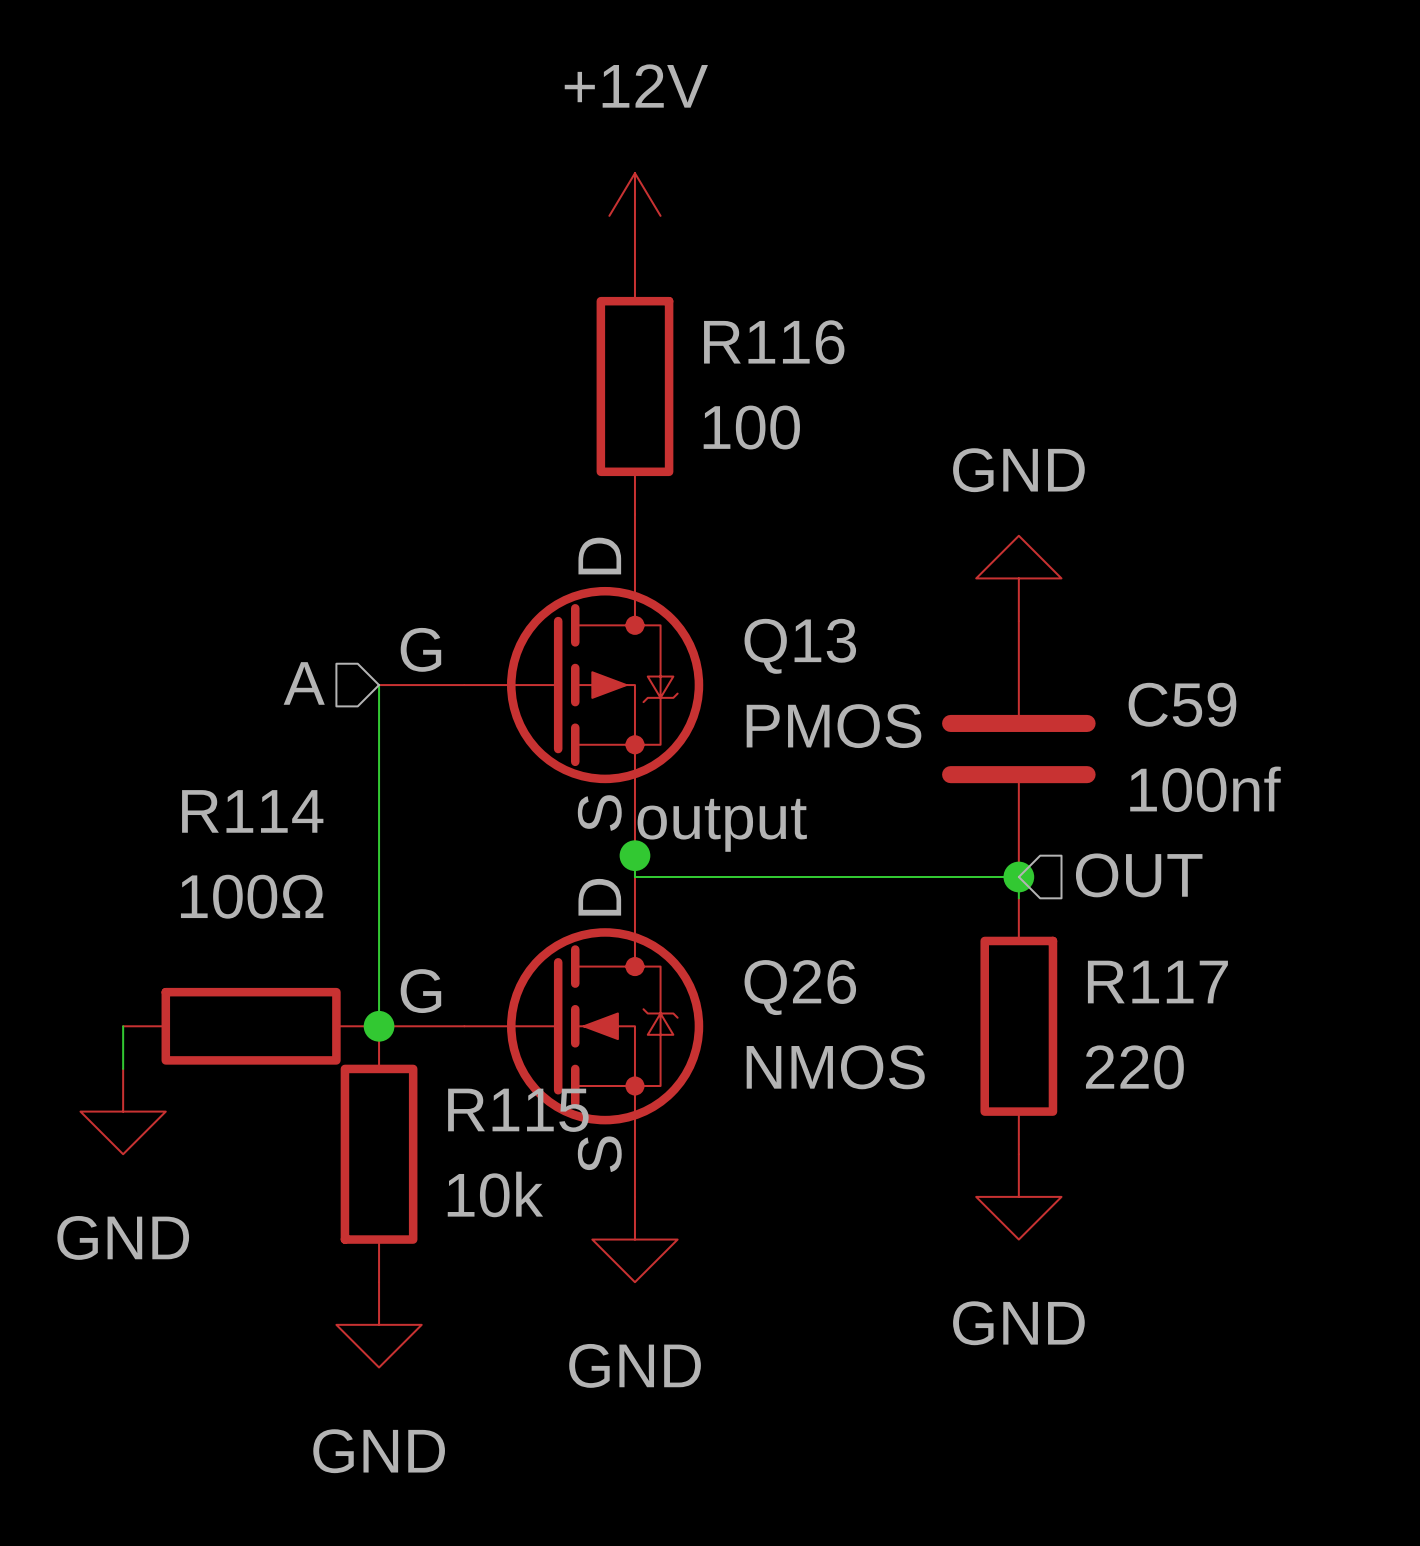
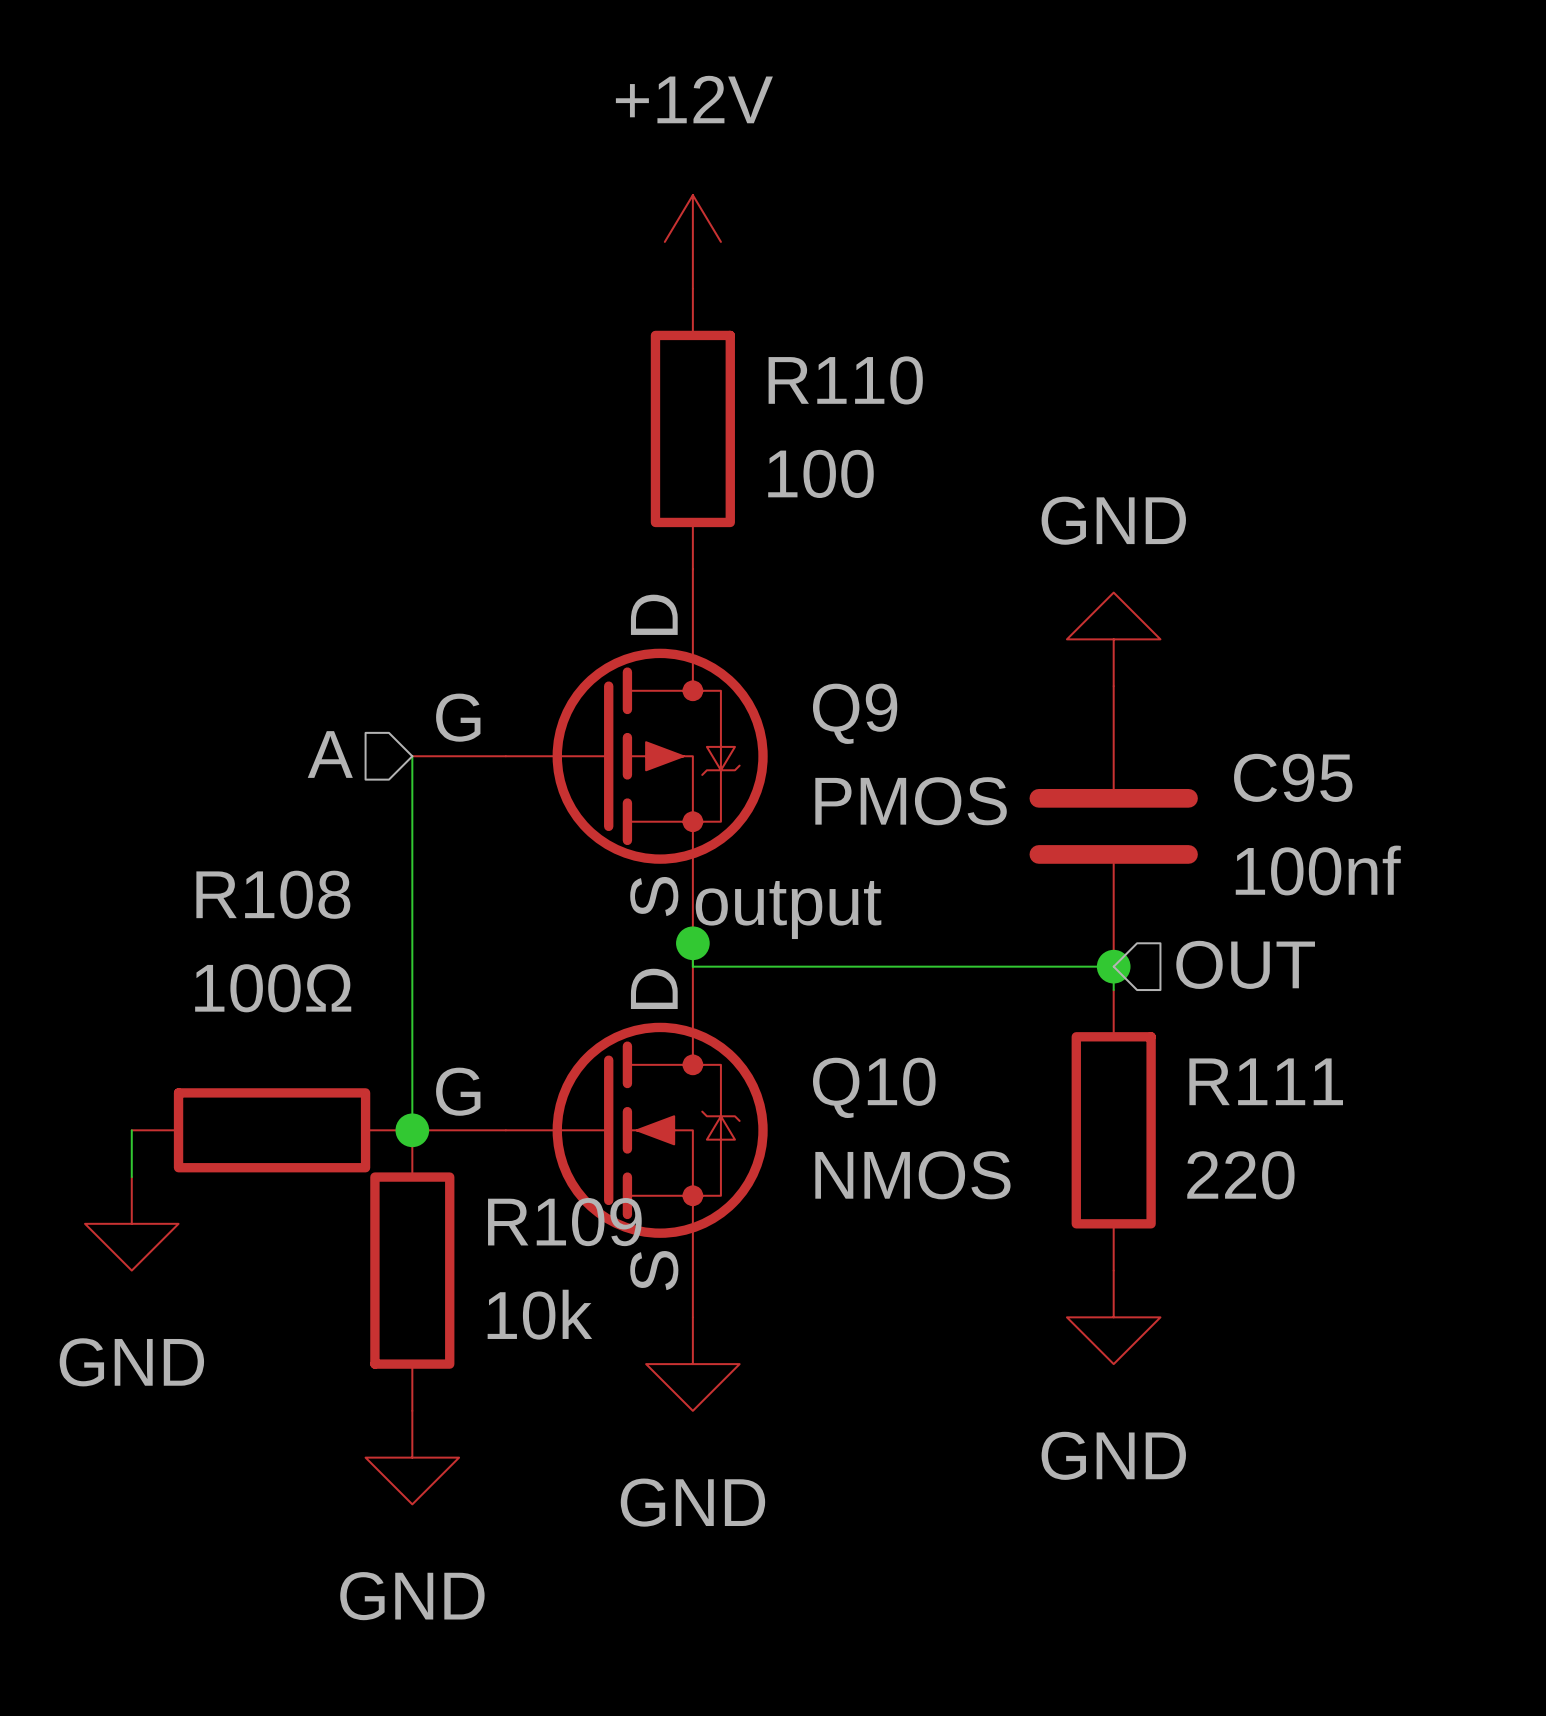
R116 name: R116 (774, 342) -> R110 (845, 380)
Q13 name: Q13 (800, 646) -> Q9 (855, 713)
C59 name: C59 (1182, 704) -> C95 (1293, 777)
R114 name: R114 (252, 811) -> R108 (273, 894)
R117 name: R117 (1157, 982) -> R111 (1266, 1081)
Q26 name: Q26 (800, 987) -> Q10 (874, 1087)
R115 name: R115 (518, 1110) -> R109 (564, 1222)

